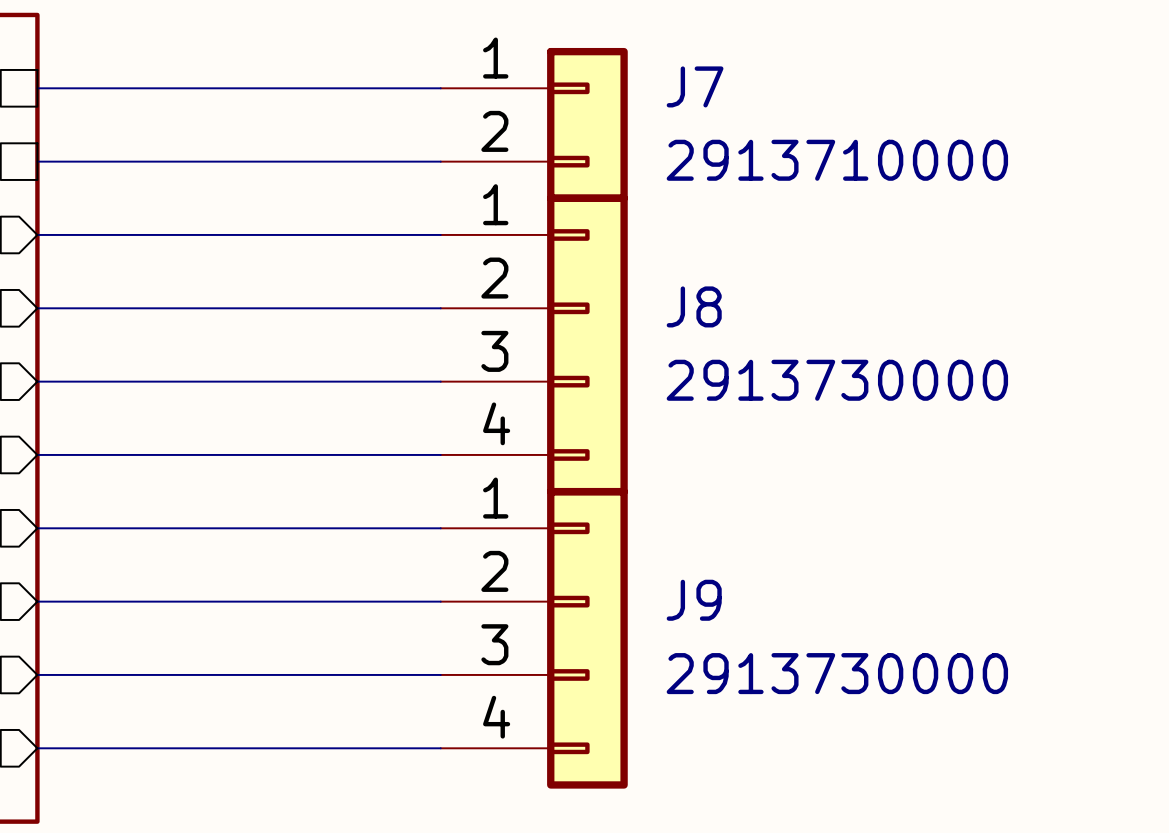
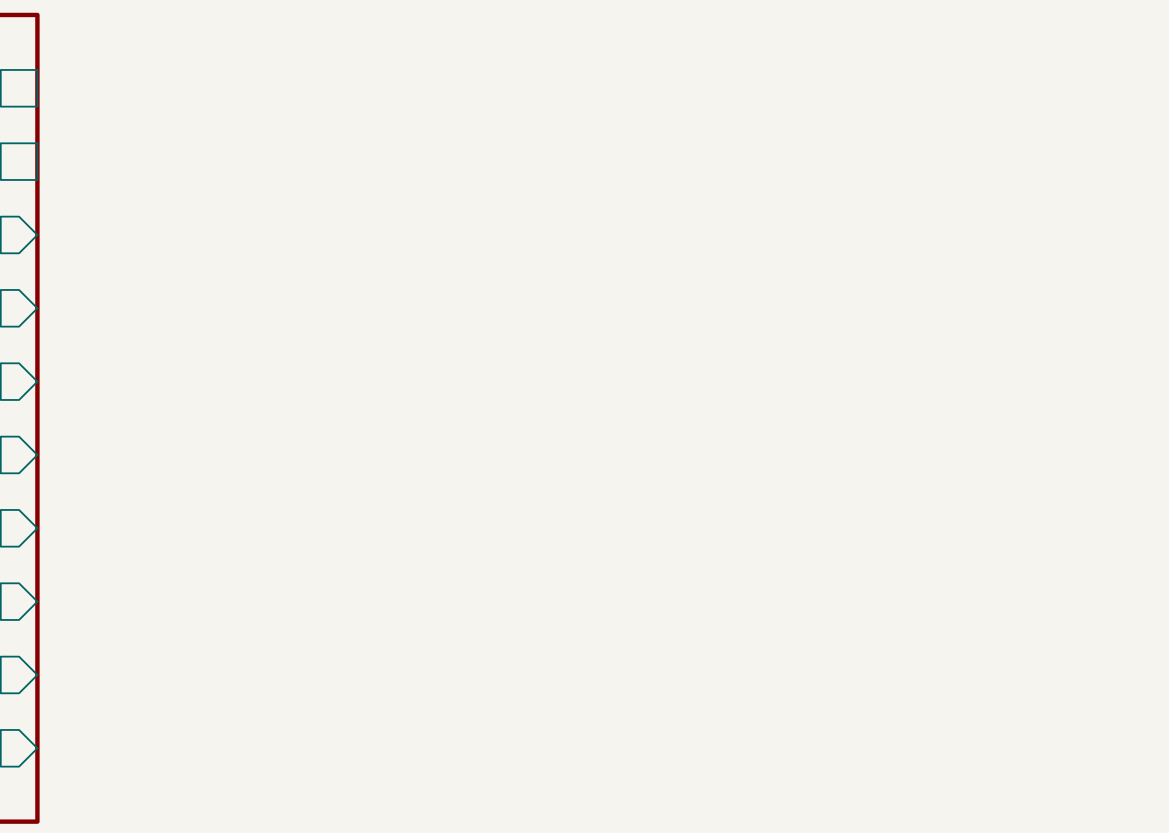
wire: (37, 88) (440, 88) -> none
J7: 2913710000 (534, 124) -> none
wire: (37, 161) (440, 161) -> none
wire: (37, 234) (440, 234) -> none
wire: (37, 308) (440, 308) -> none
J8: 2913730000 (534, 344) -> none
wire: (37, 381) (440, 381) -> none
wire: (37, 454) (440, 454) -> none
wire: (37, 528) (440, 528) -> none
wire: (37, 601) (440, 601) -> none
J9: 2913730000 (534, 638) -> none
wire: (37, 674) (440, 674) -> none
wire: (37, 748) (440, 748) -> none

